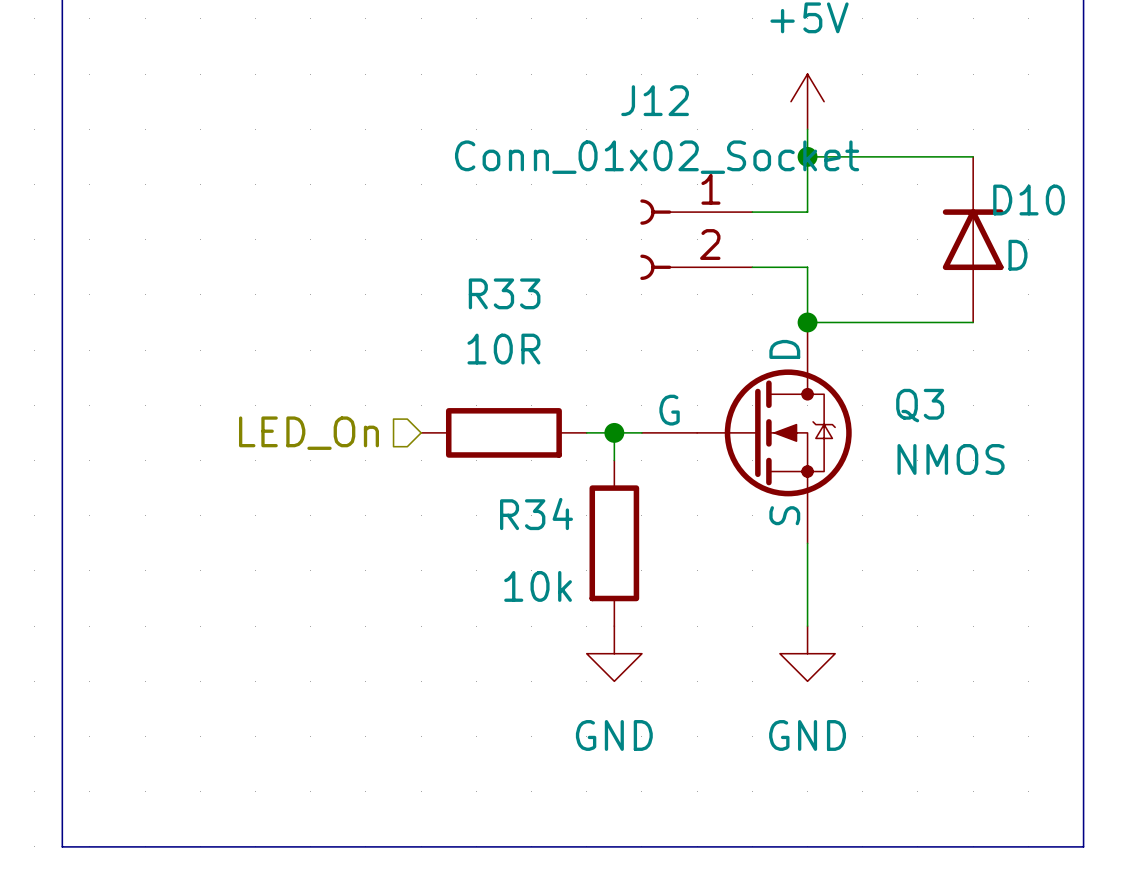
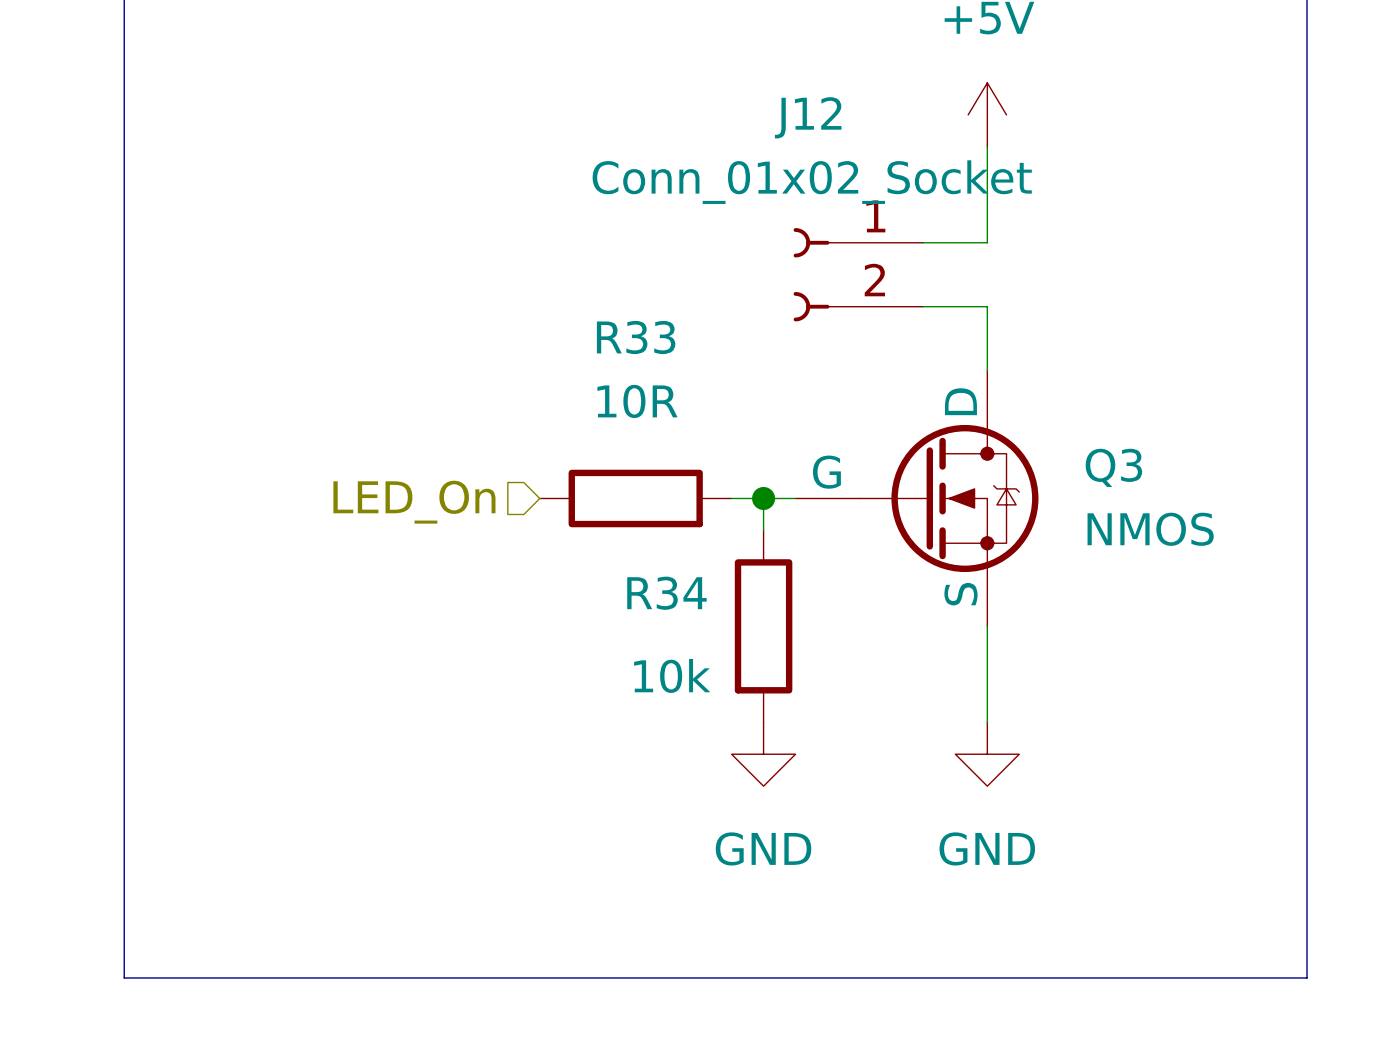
wire: (807, 156) (973, 156) -> none
junction: (807, 156) -> none
D10: D (973, 239) -> none
wire: (807, 322) (973, 322) -> none
junction: (807, 322) -> none

